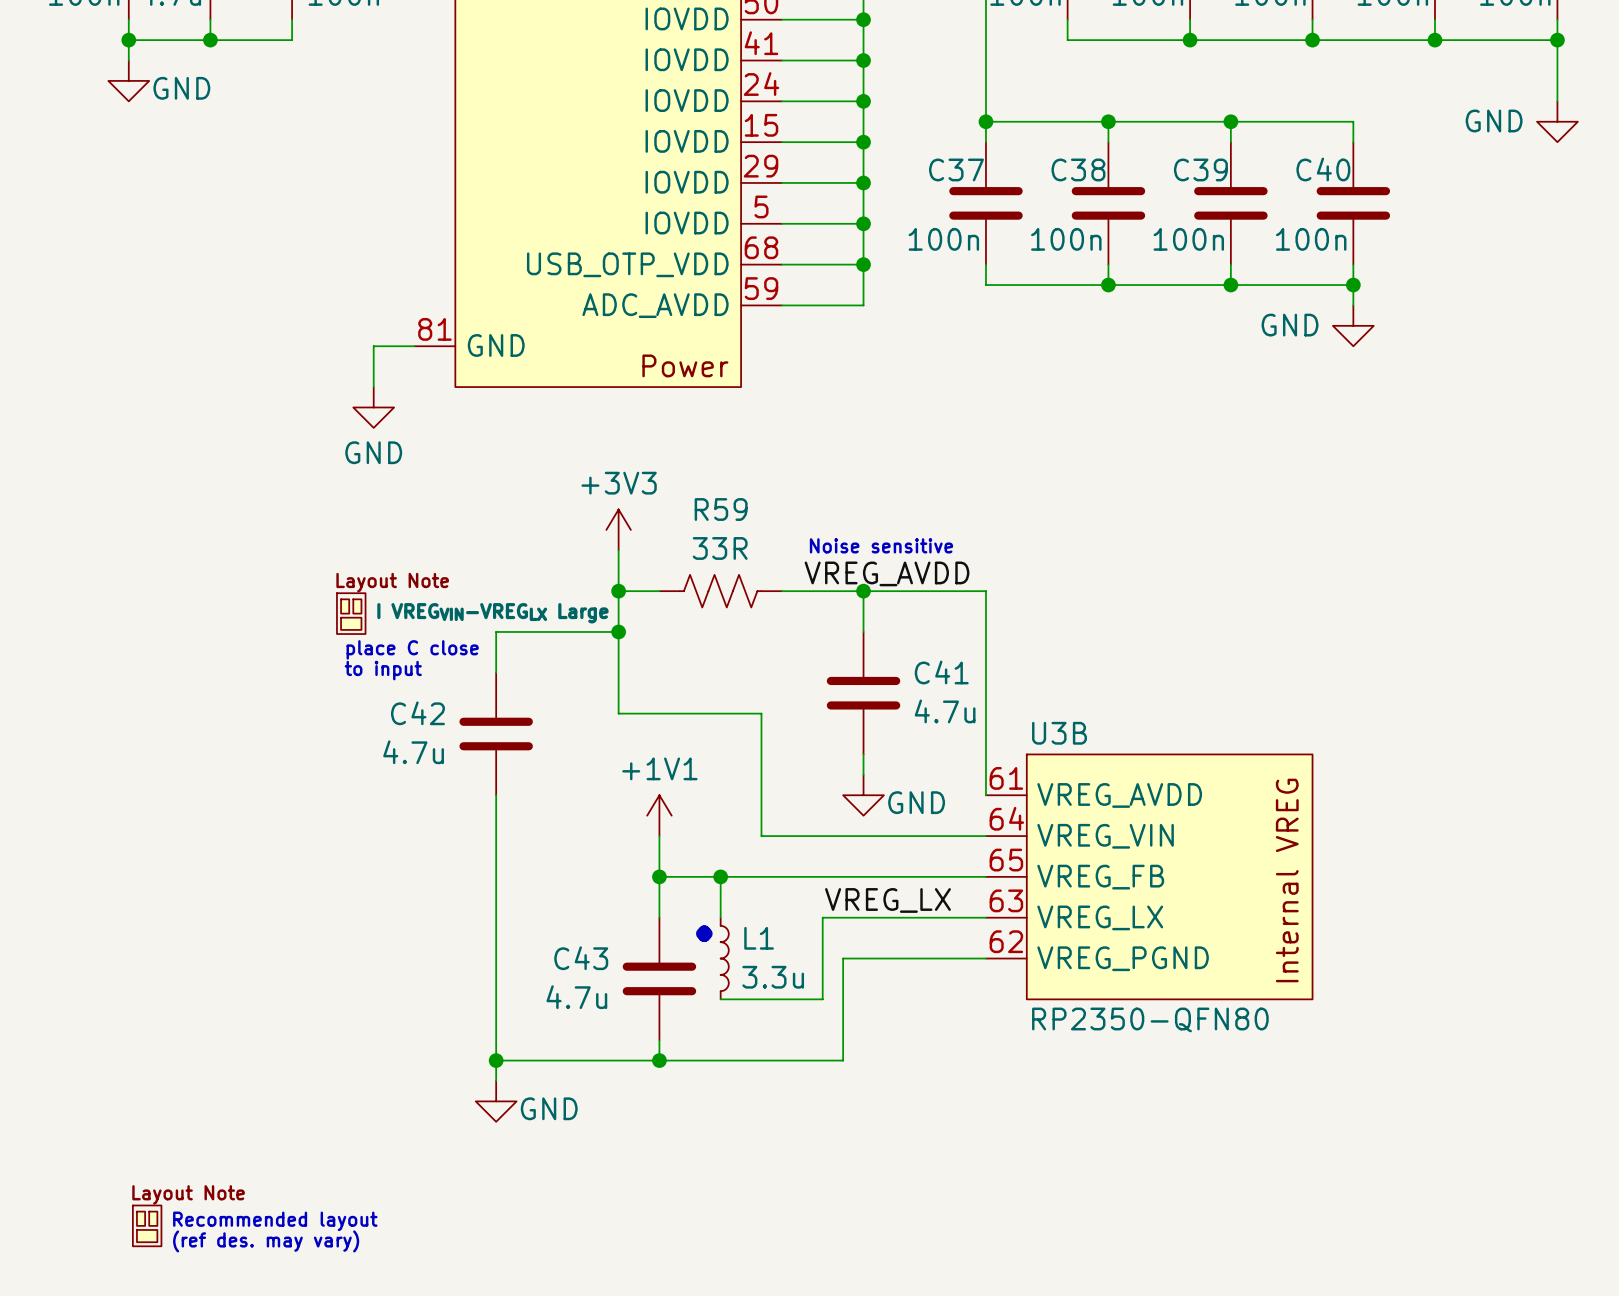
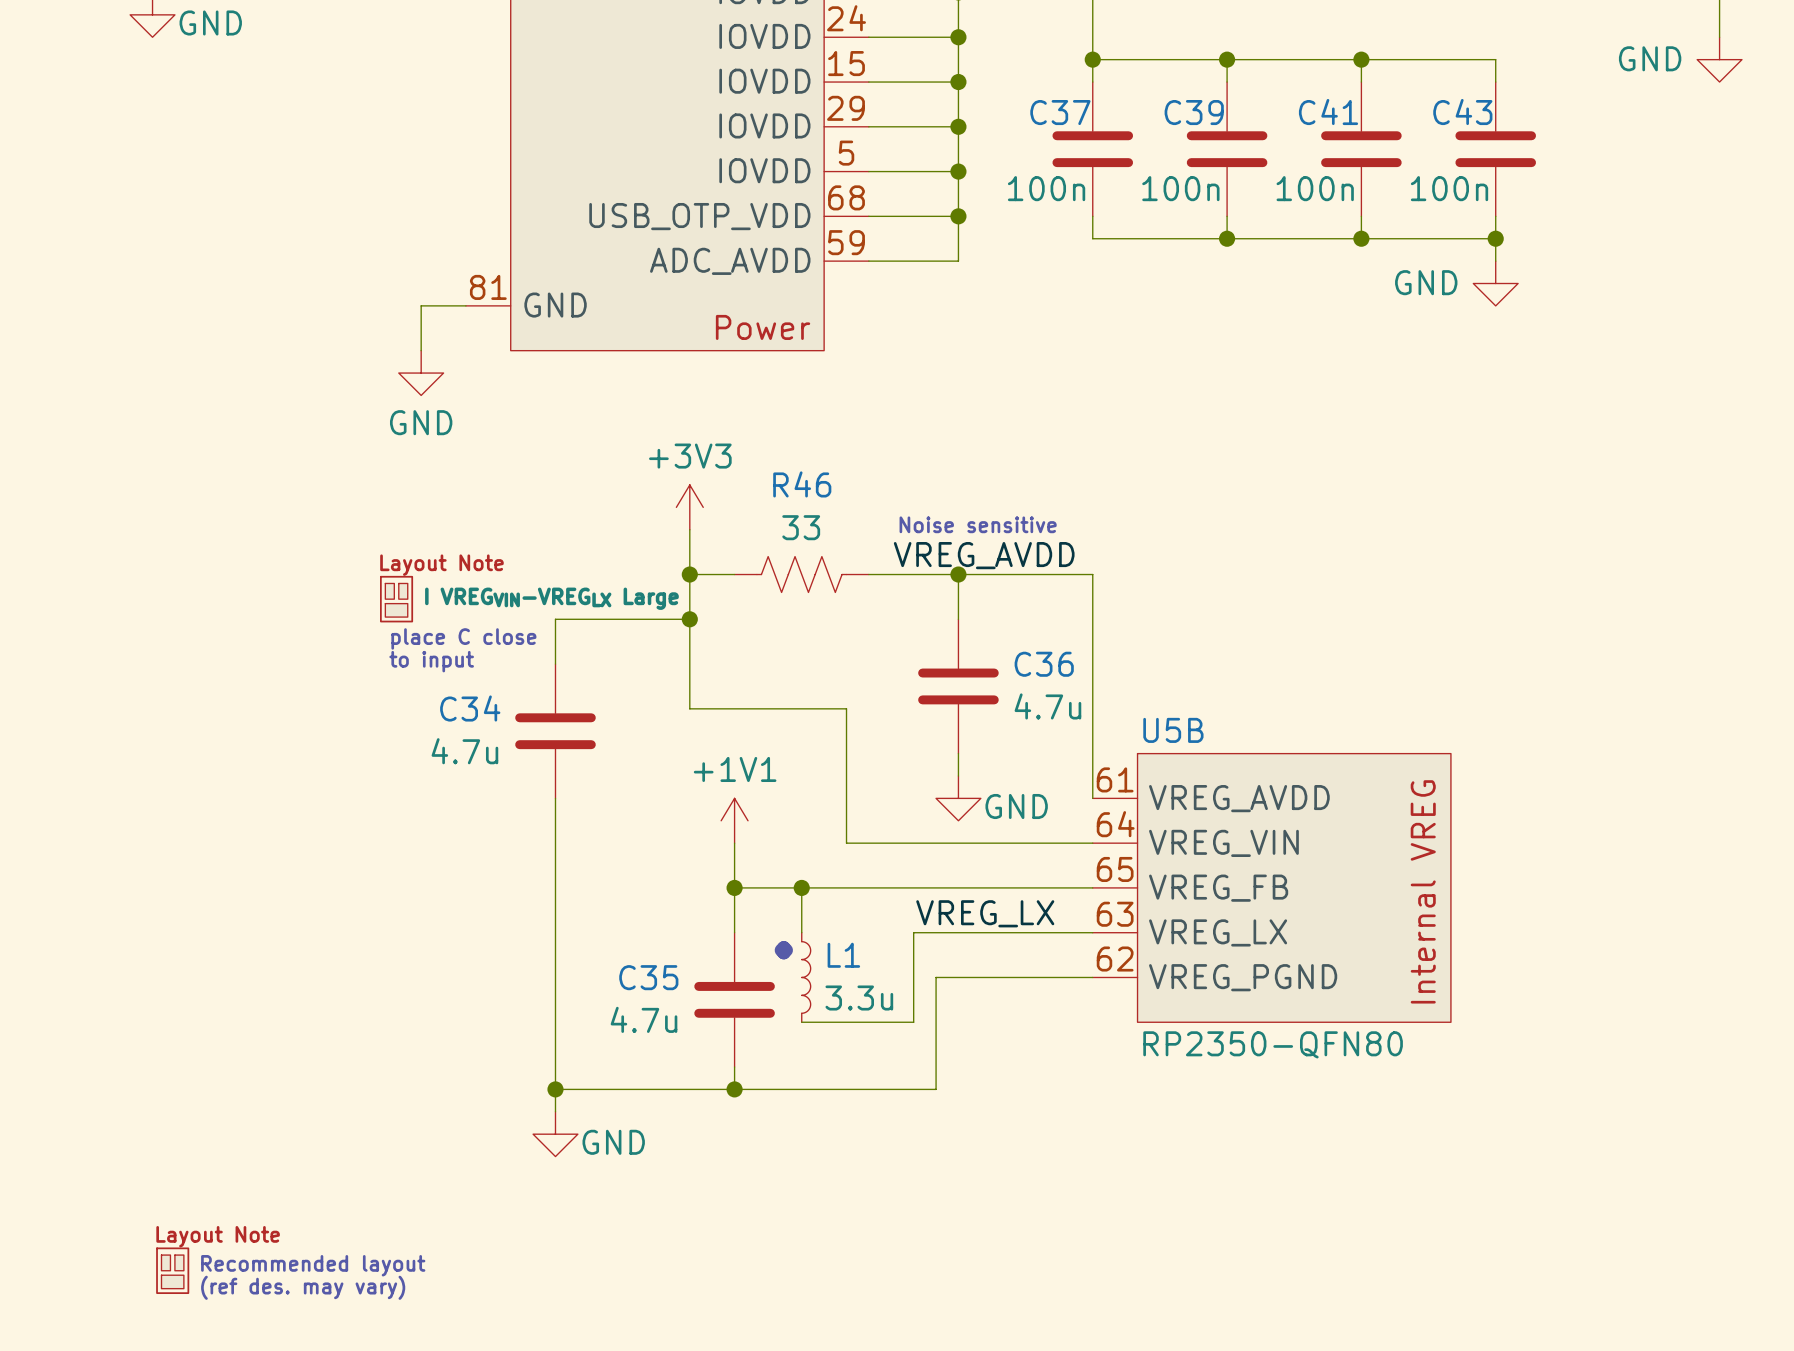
C38 name: C38 (1078, 169) -> C39 (1194, 112)
C39 name: C39 (1200, 169) -> C41 (1328, 112)
C40 name: C40 (1323, 169) -> C43 (1462, 112)
R59 name: R59 (721, 509) -> R46 (802, 484)
R59 value: 33R (720, 548) -> 33 (801, 527)
C41 name: C41 (941, 672) -> C36 (1044, 664)
C42 name: C42 (417, 713) -> C34 (470, 708)
U3B name: U3B (1059, 733) -> U5B (1173, 730)
C43 name: C43 (581, 958) -> C35 (648, 977)

